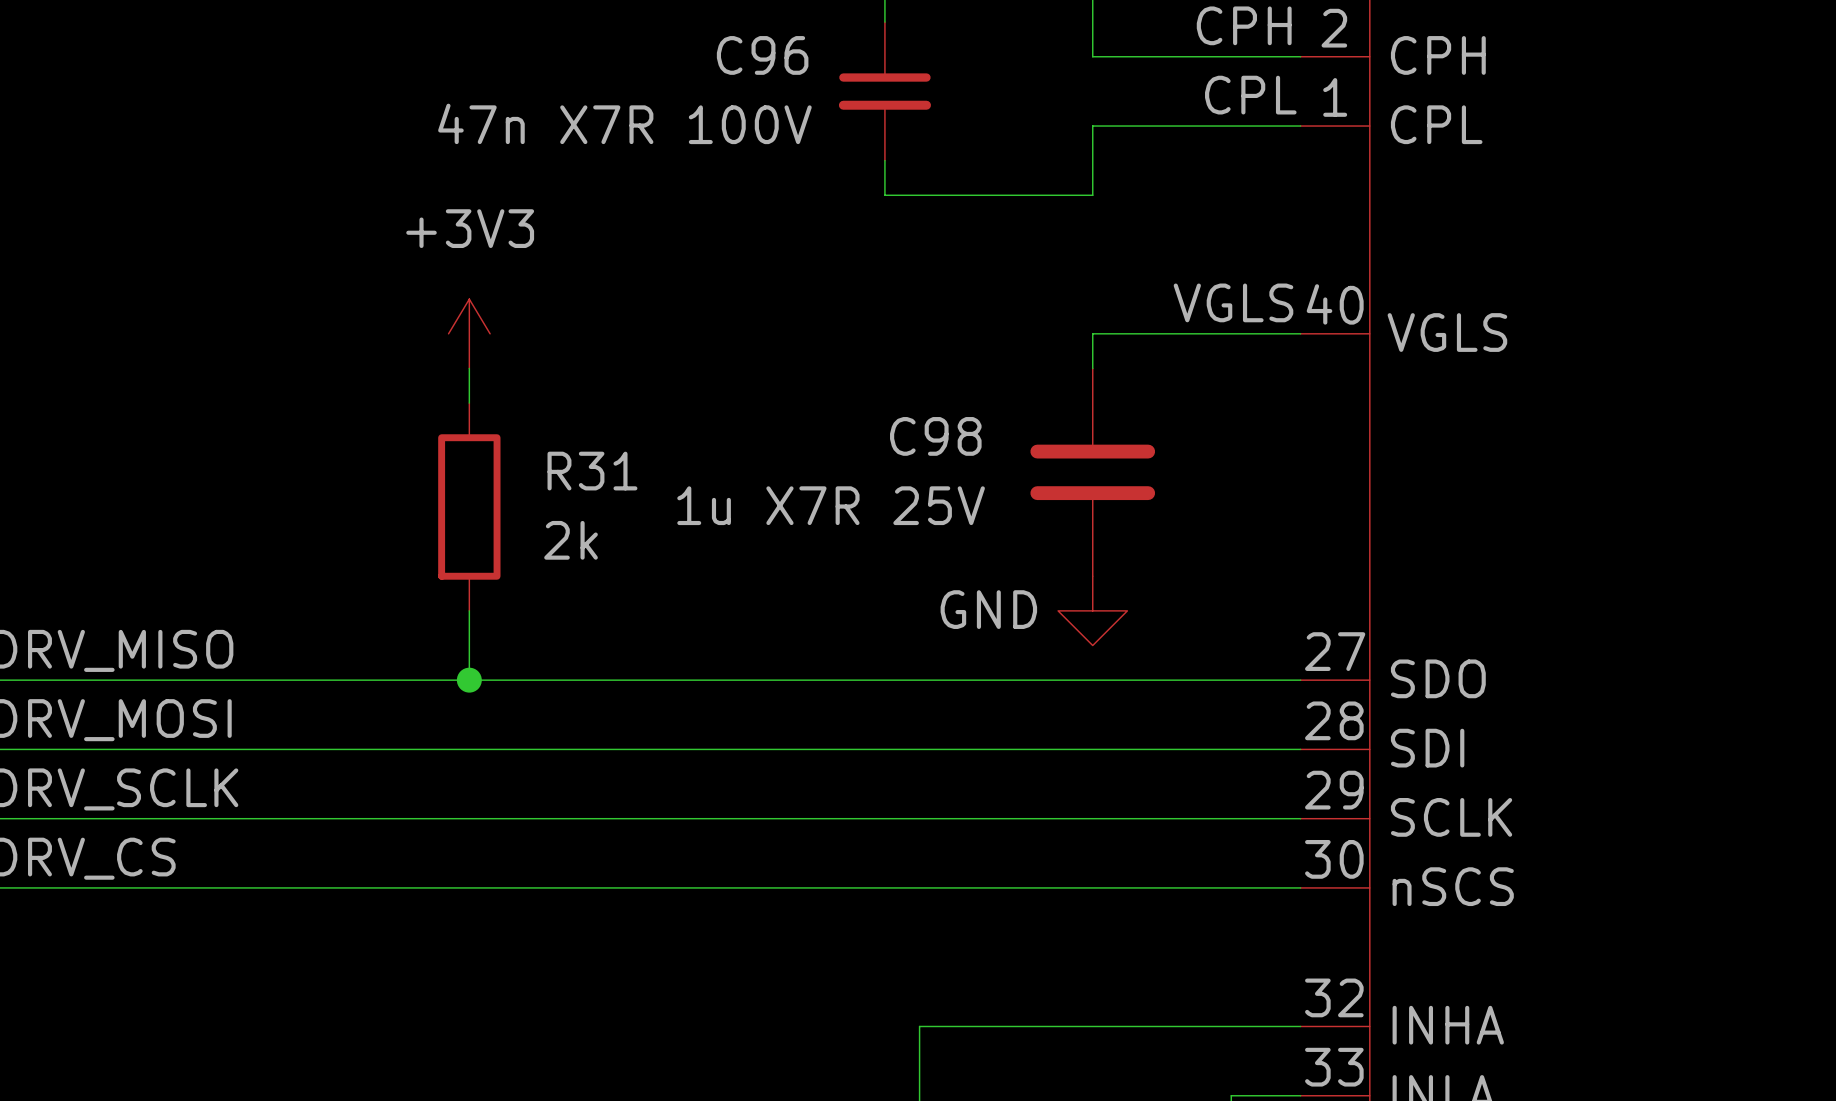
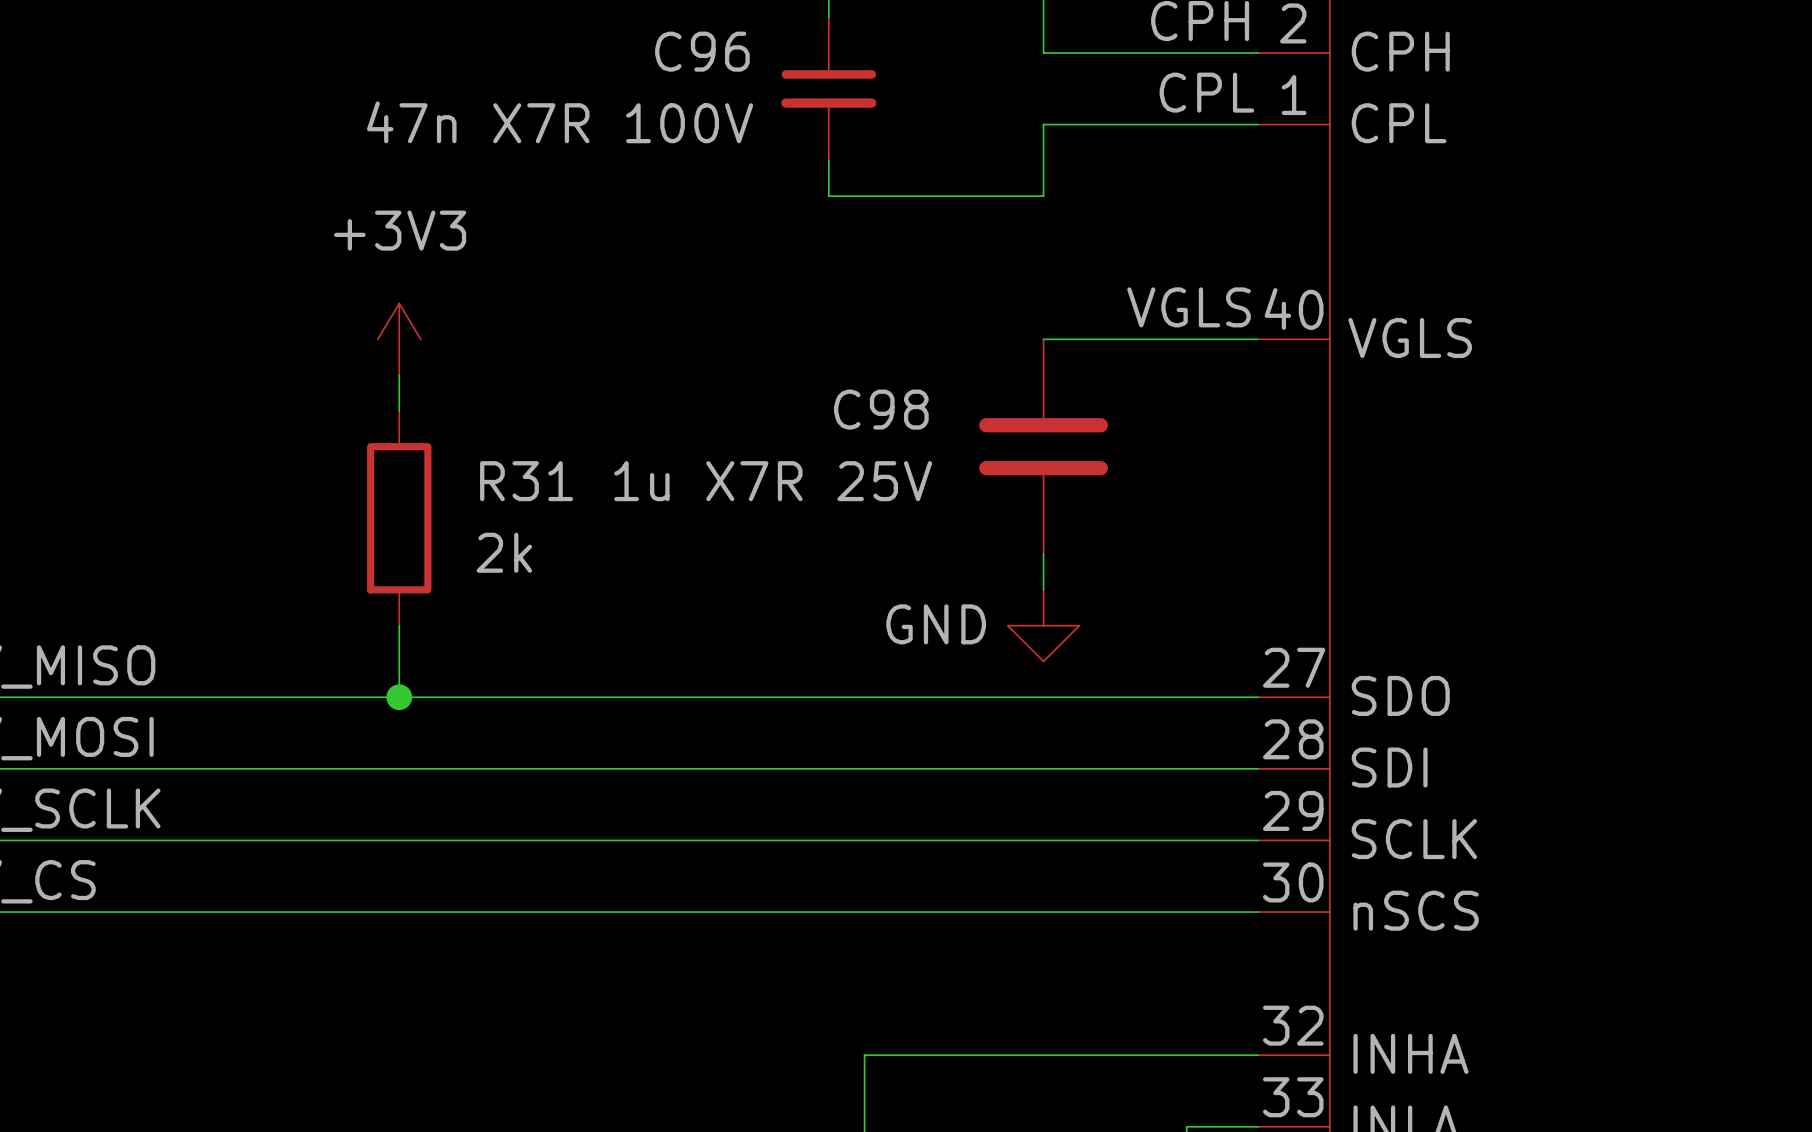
C98 position: (1092, 472) -> (1043, 446)

